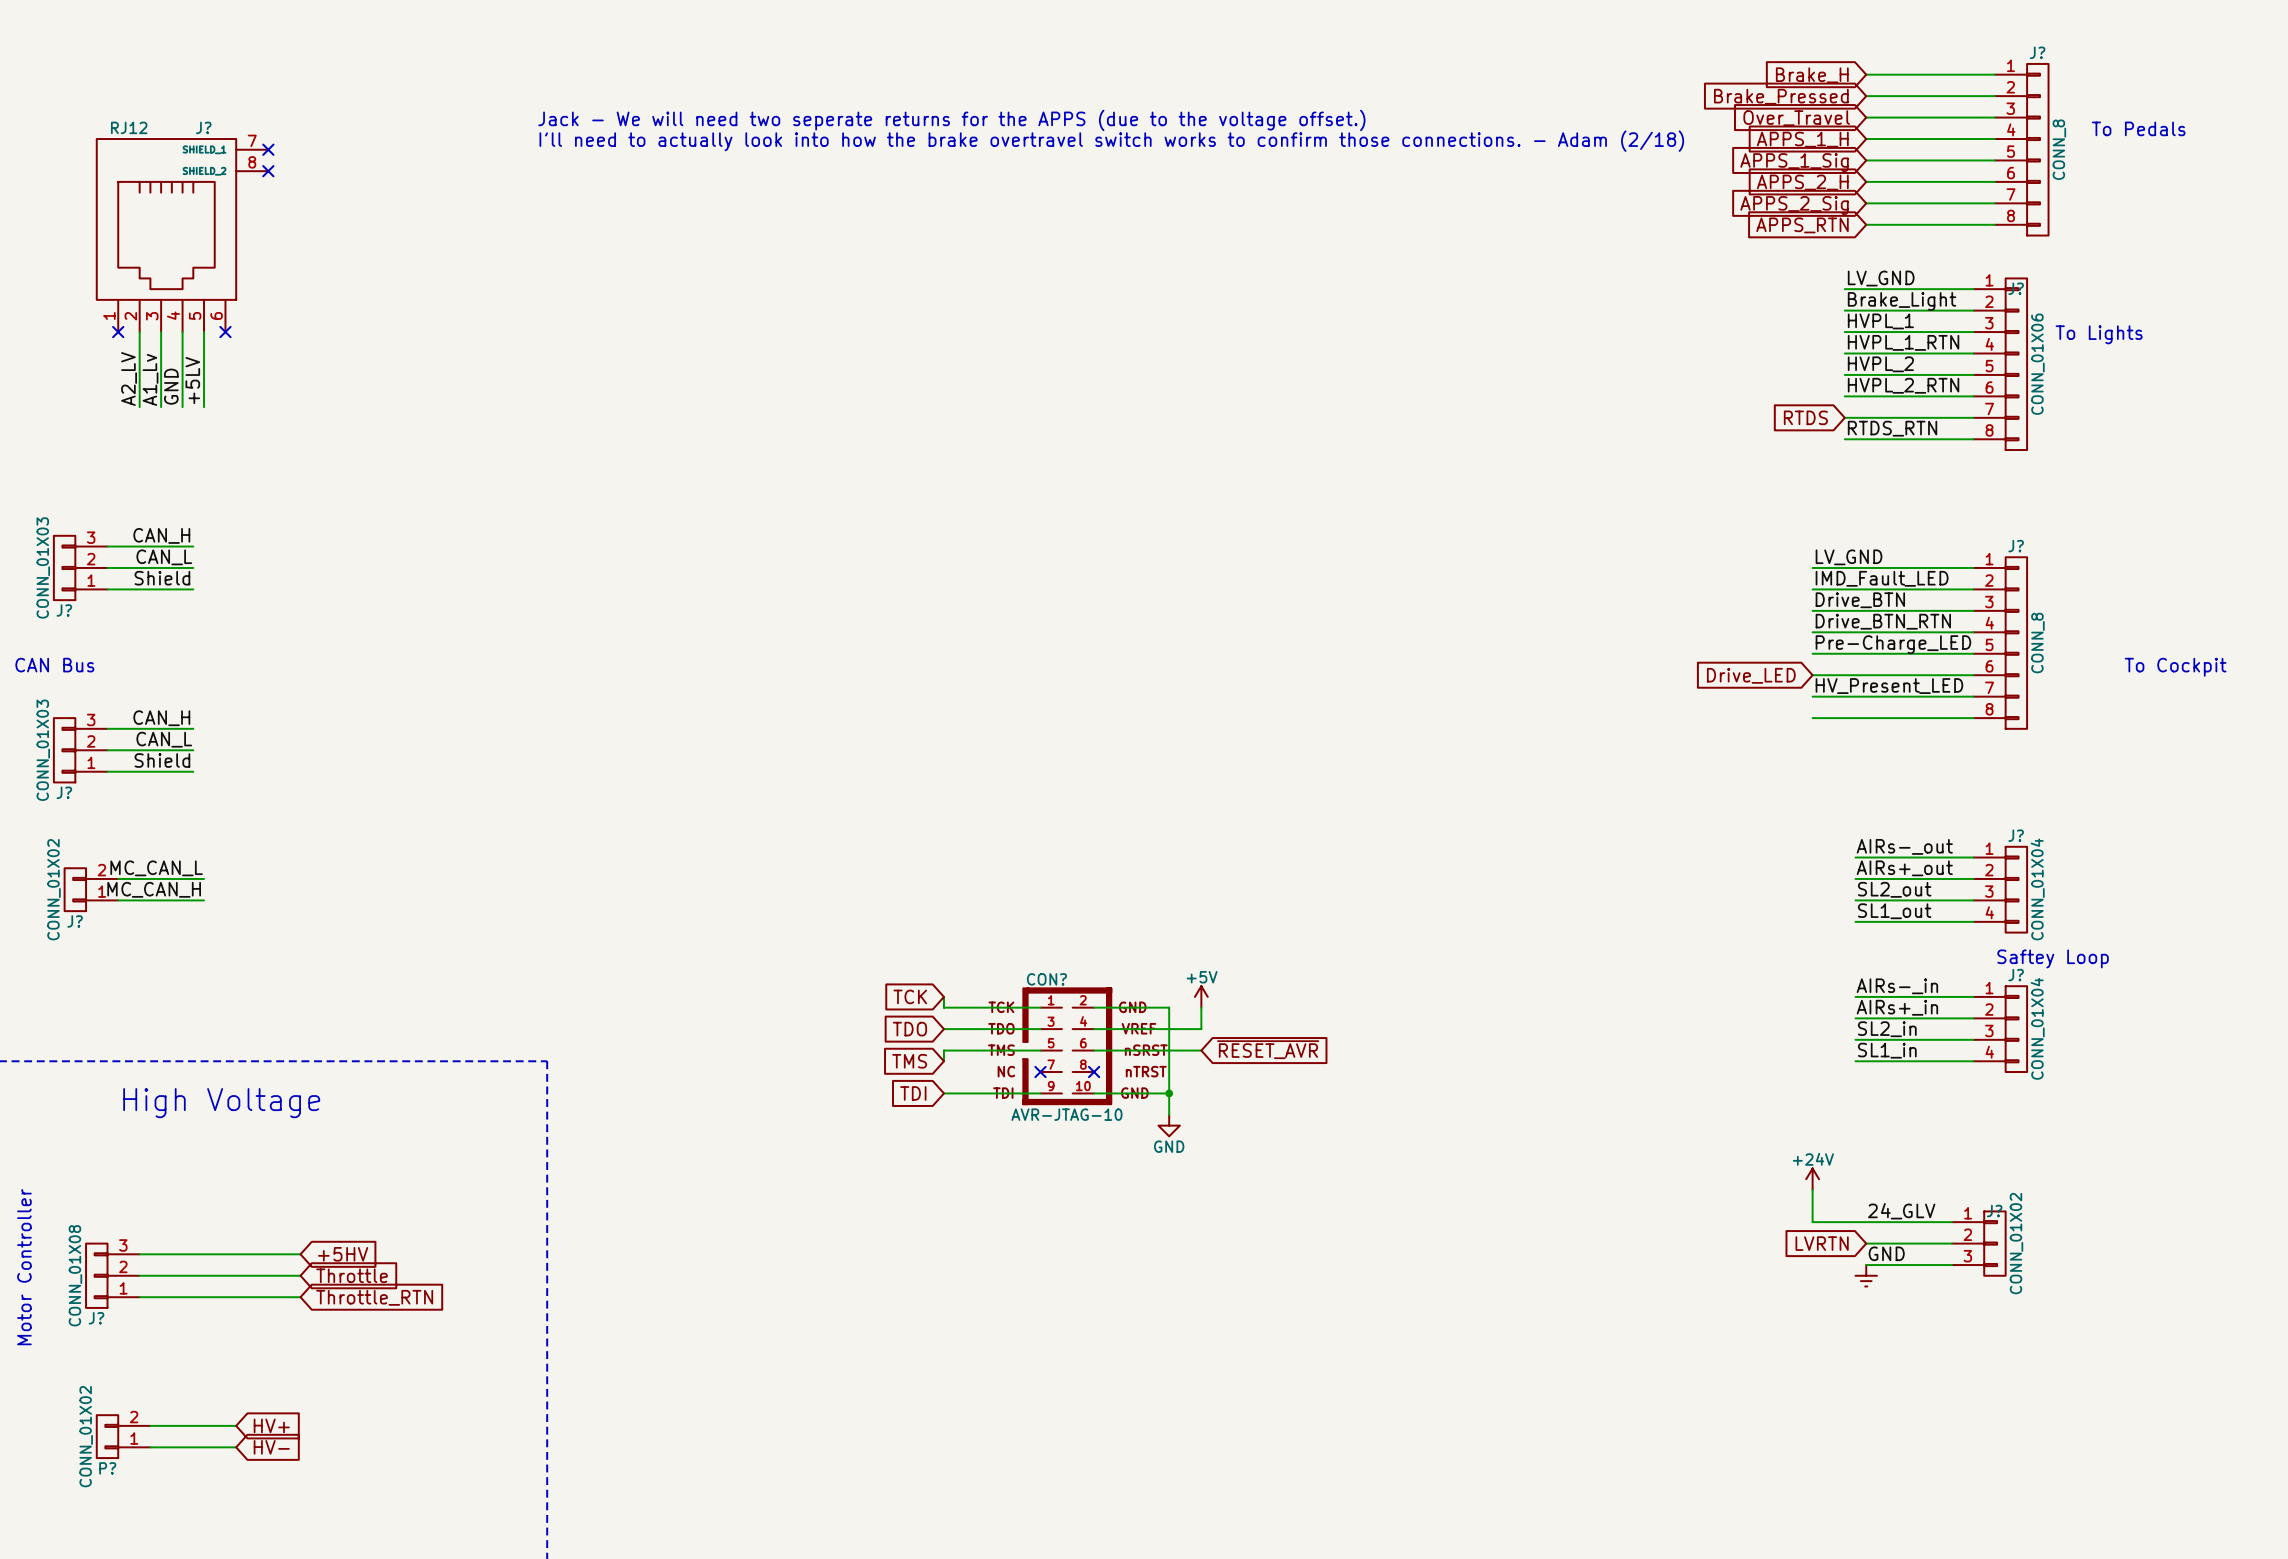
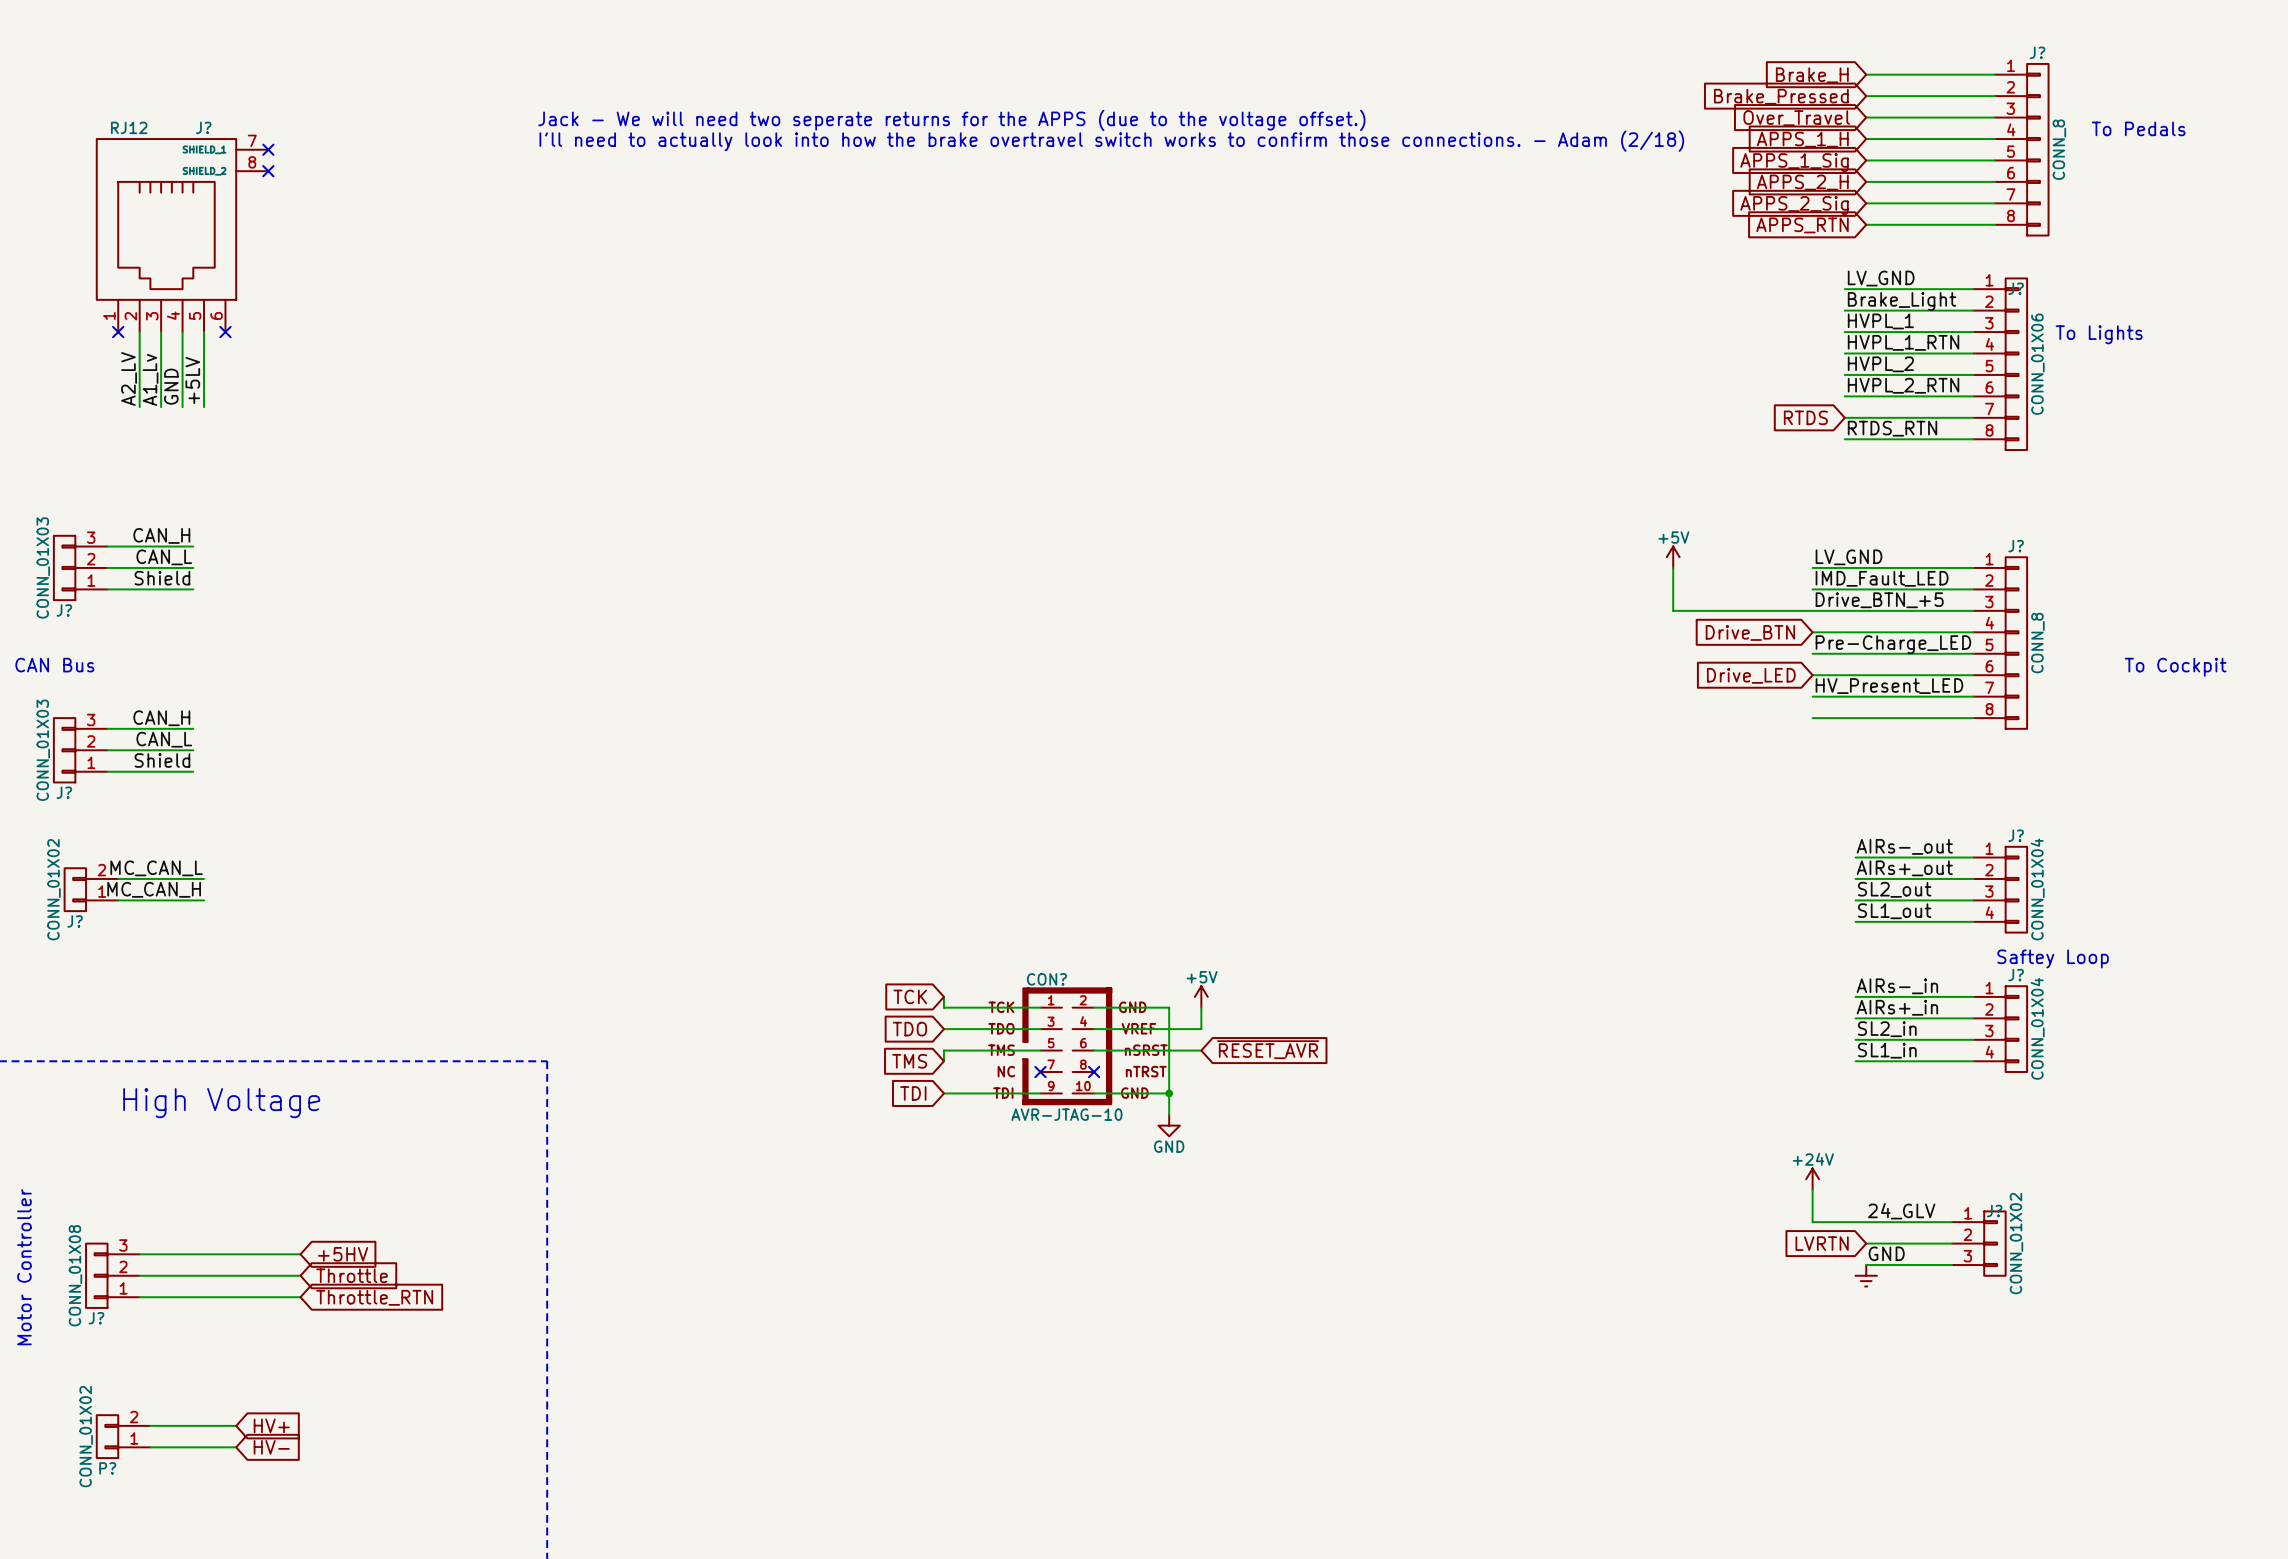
power symbol: none -> +5V (1673, 557)
wire: none -> (1673, 567) (1673, 610) (1812, 610)
label: Drive_BTN (1860, 600) -> Drive_BTN_+5 (1879, 600)
label: Drive_BTN_RTN (1883, 621) -> none
global label: none -> Drive_BTN (1750, 632)

